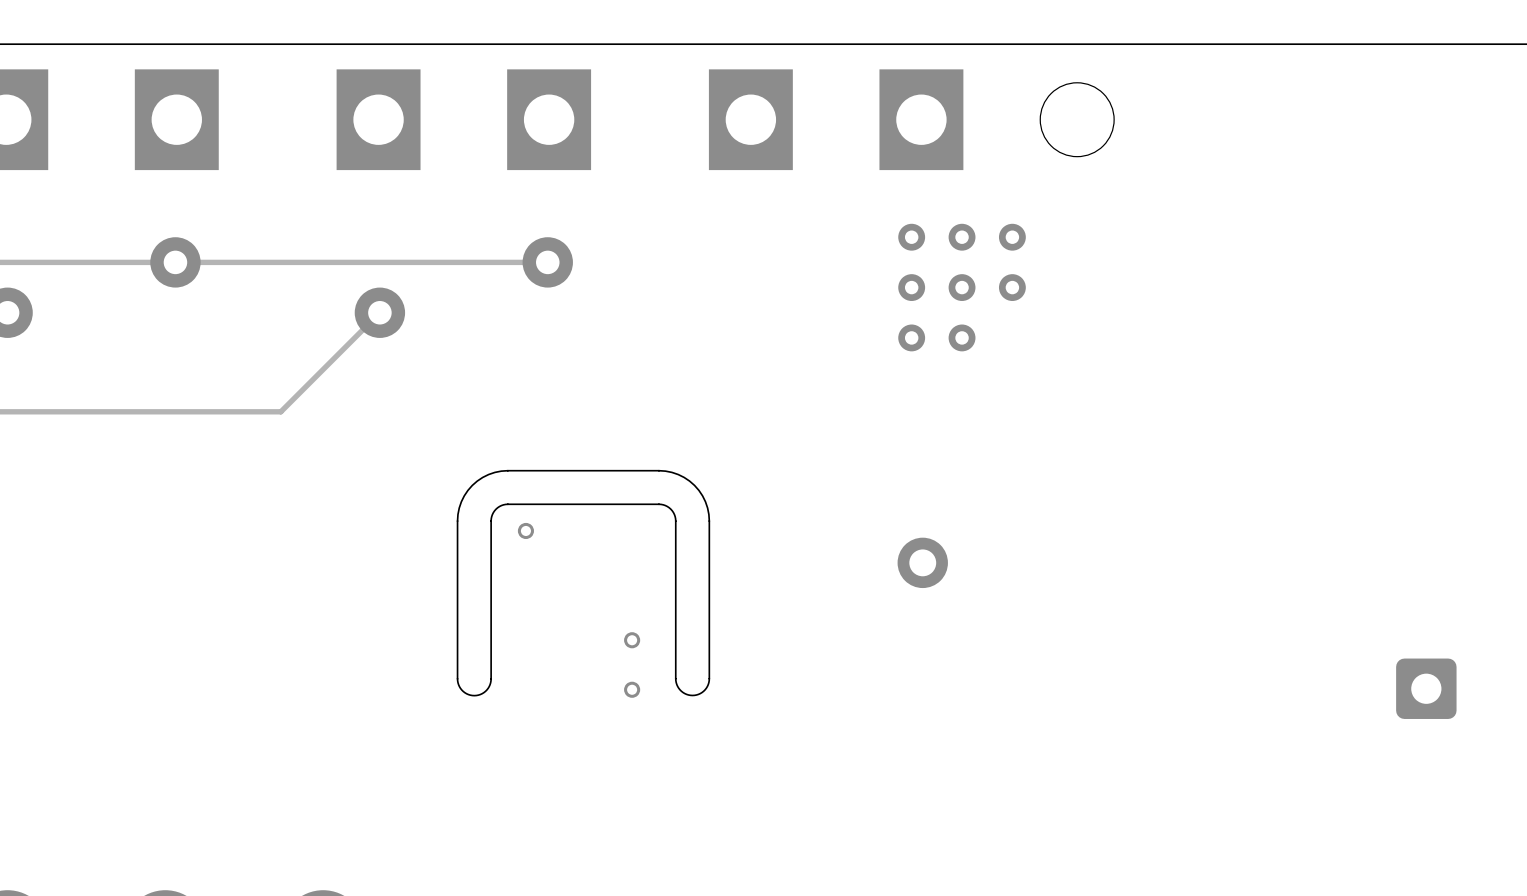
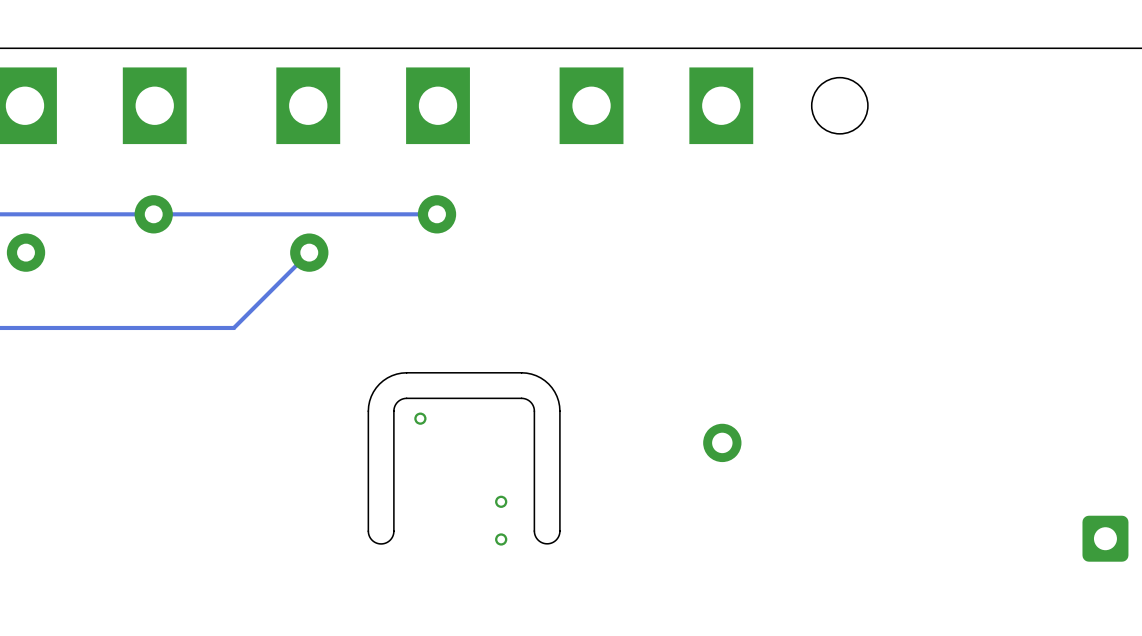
via: (911, 237) -> none
via: (962, 237) -> none
via: (1012, 237) -> none
via: (911, 287) -> none
via: (962, 287) -> none
via: (1012, 287) -> none
via: (911, 337) -> none
via: (962, 337) -> none

